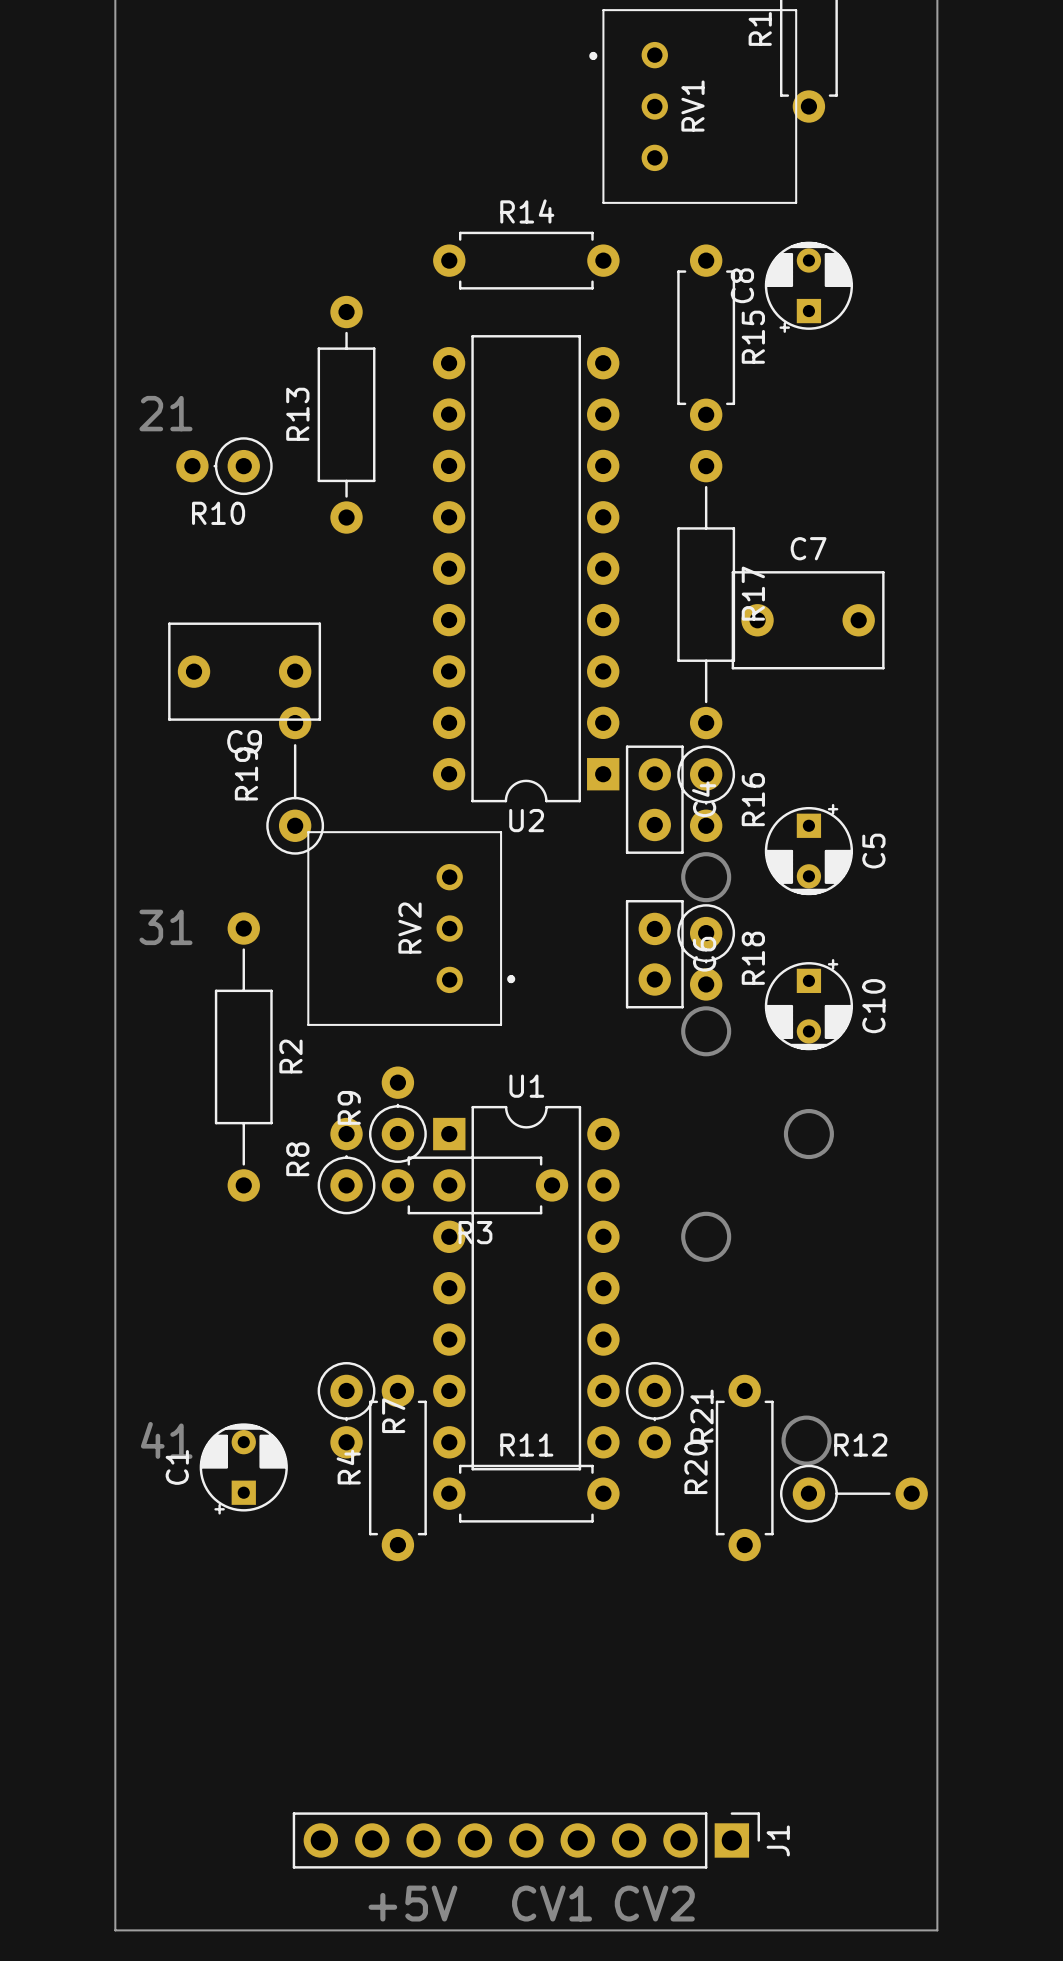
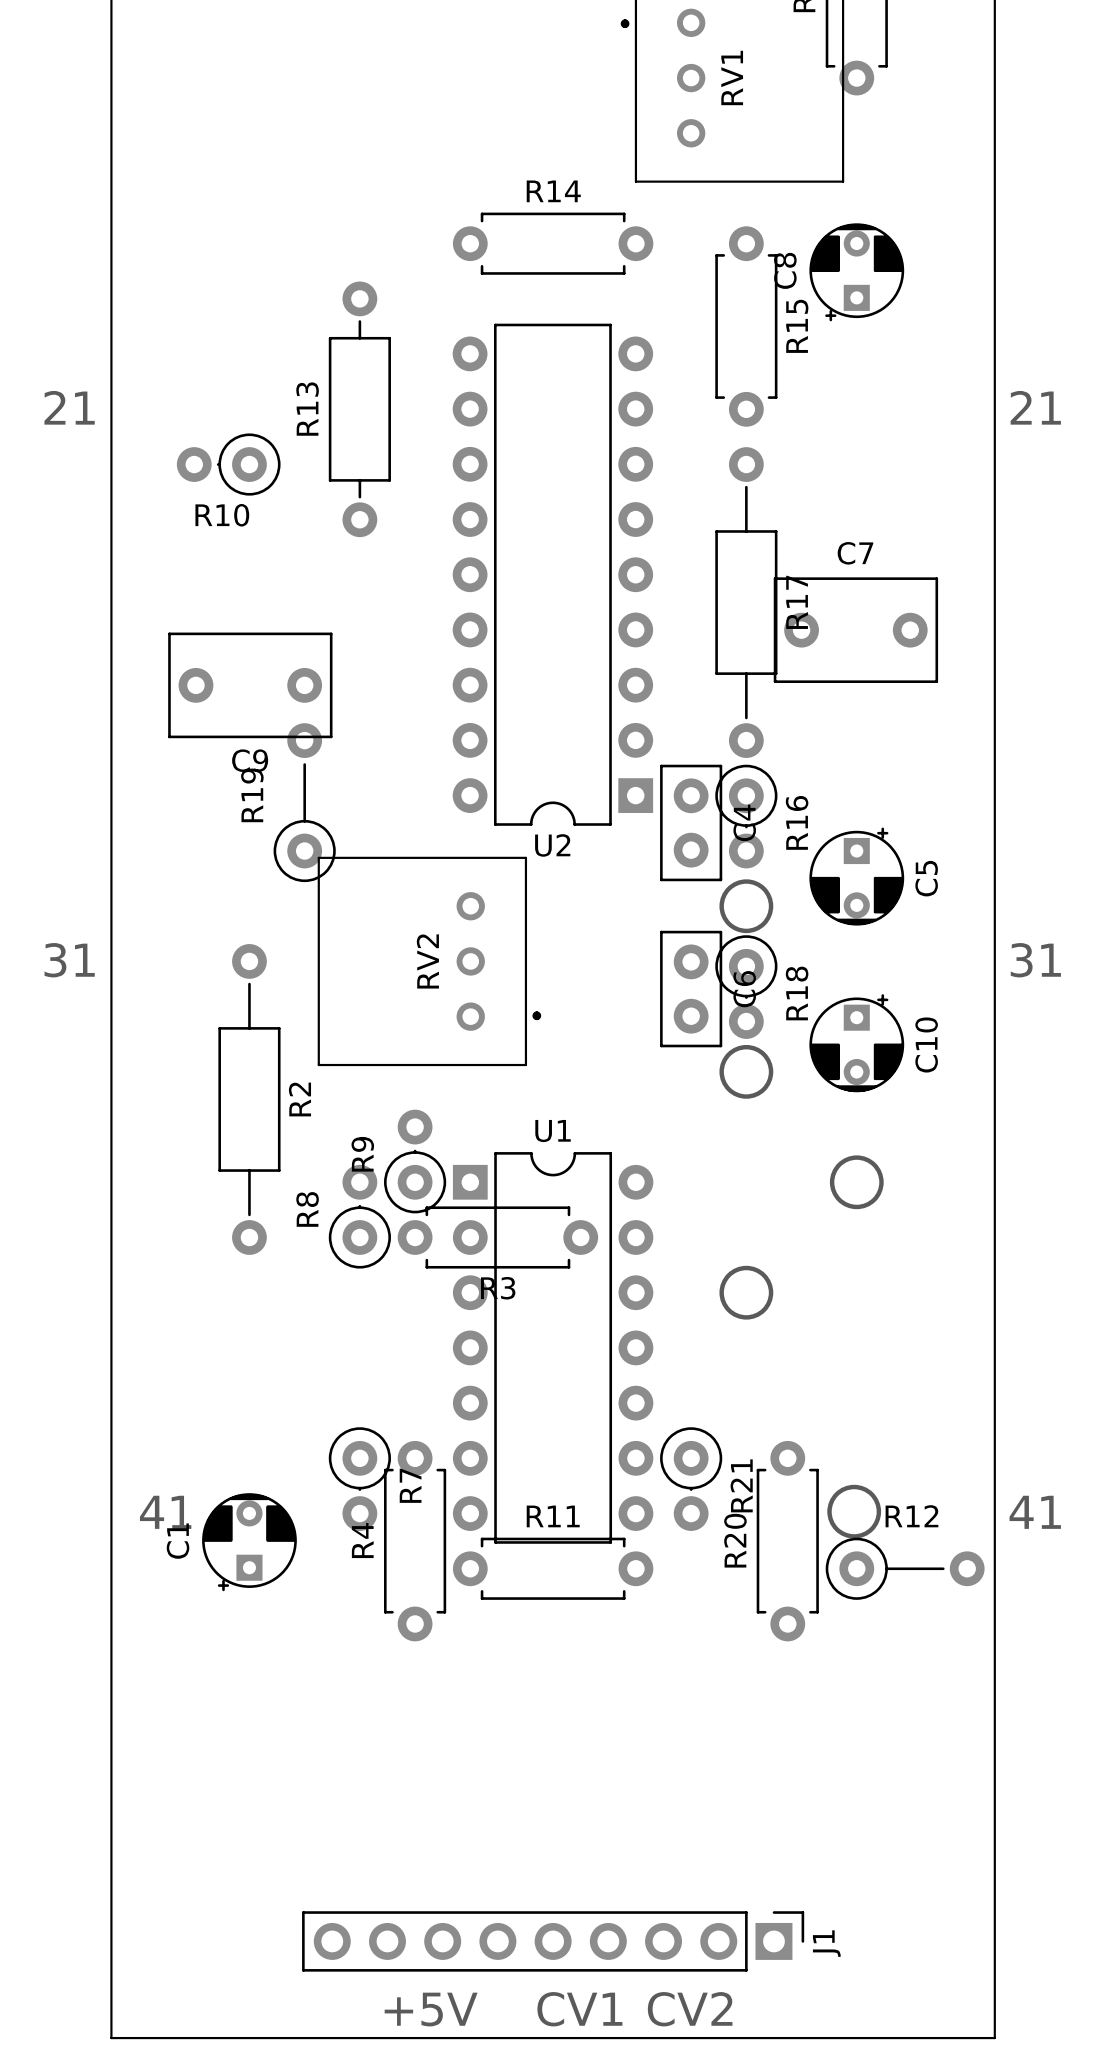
text position: 21 (165, 413) -> 21 (69, 407)
text: none -> 21 (1035, 407)
text position: 31 (165, 927) -> 31 (69, 960)
text: none -> 31 (1035, 960)
text: none -> 41 (1035, 1512)

